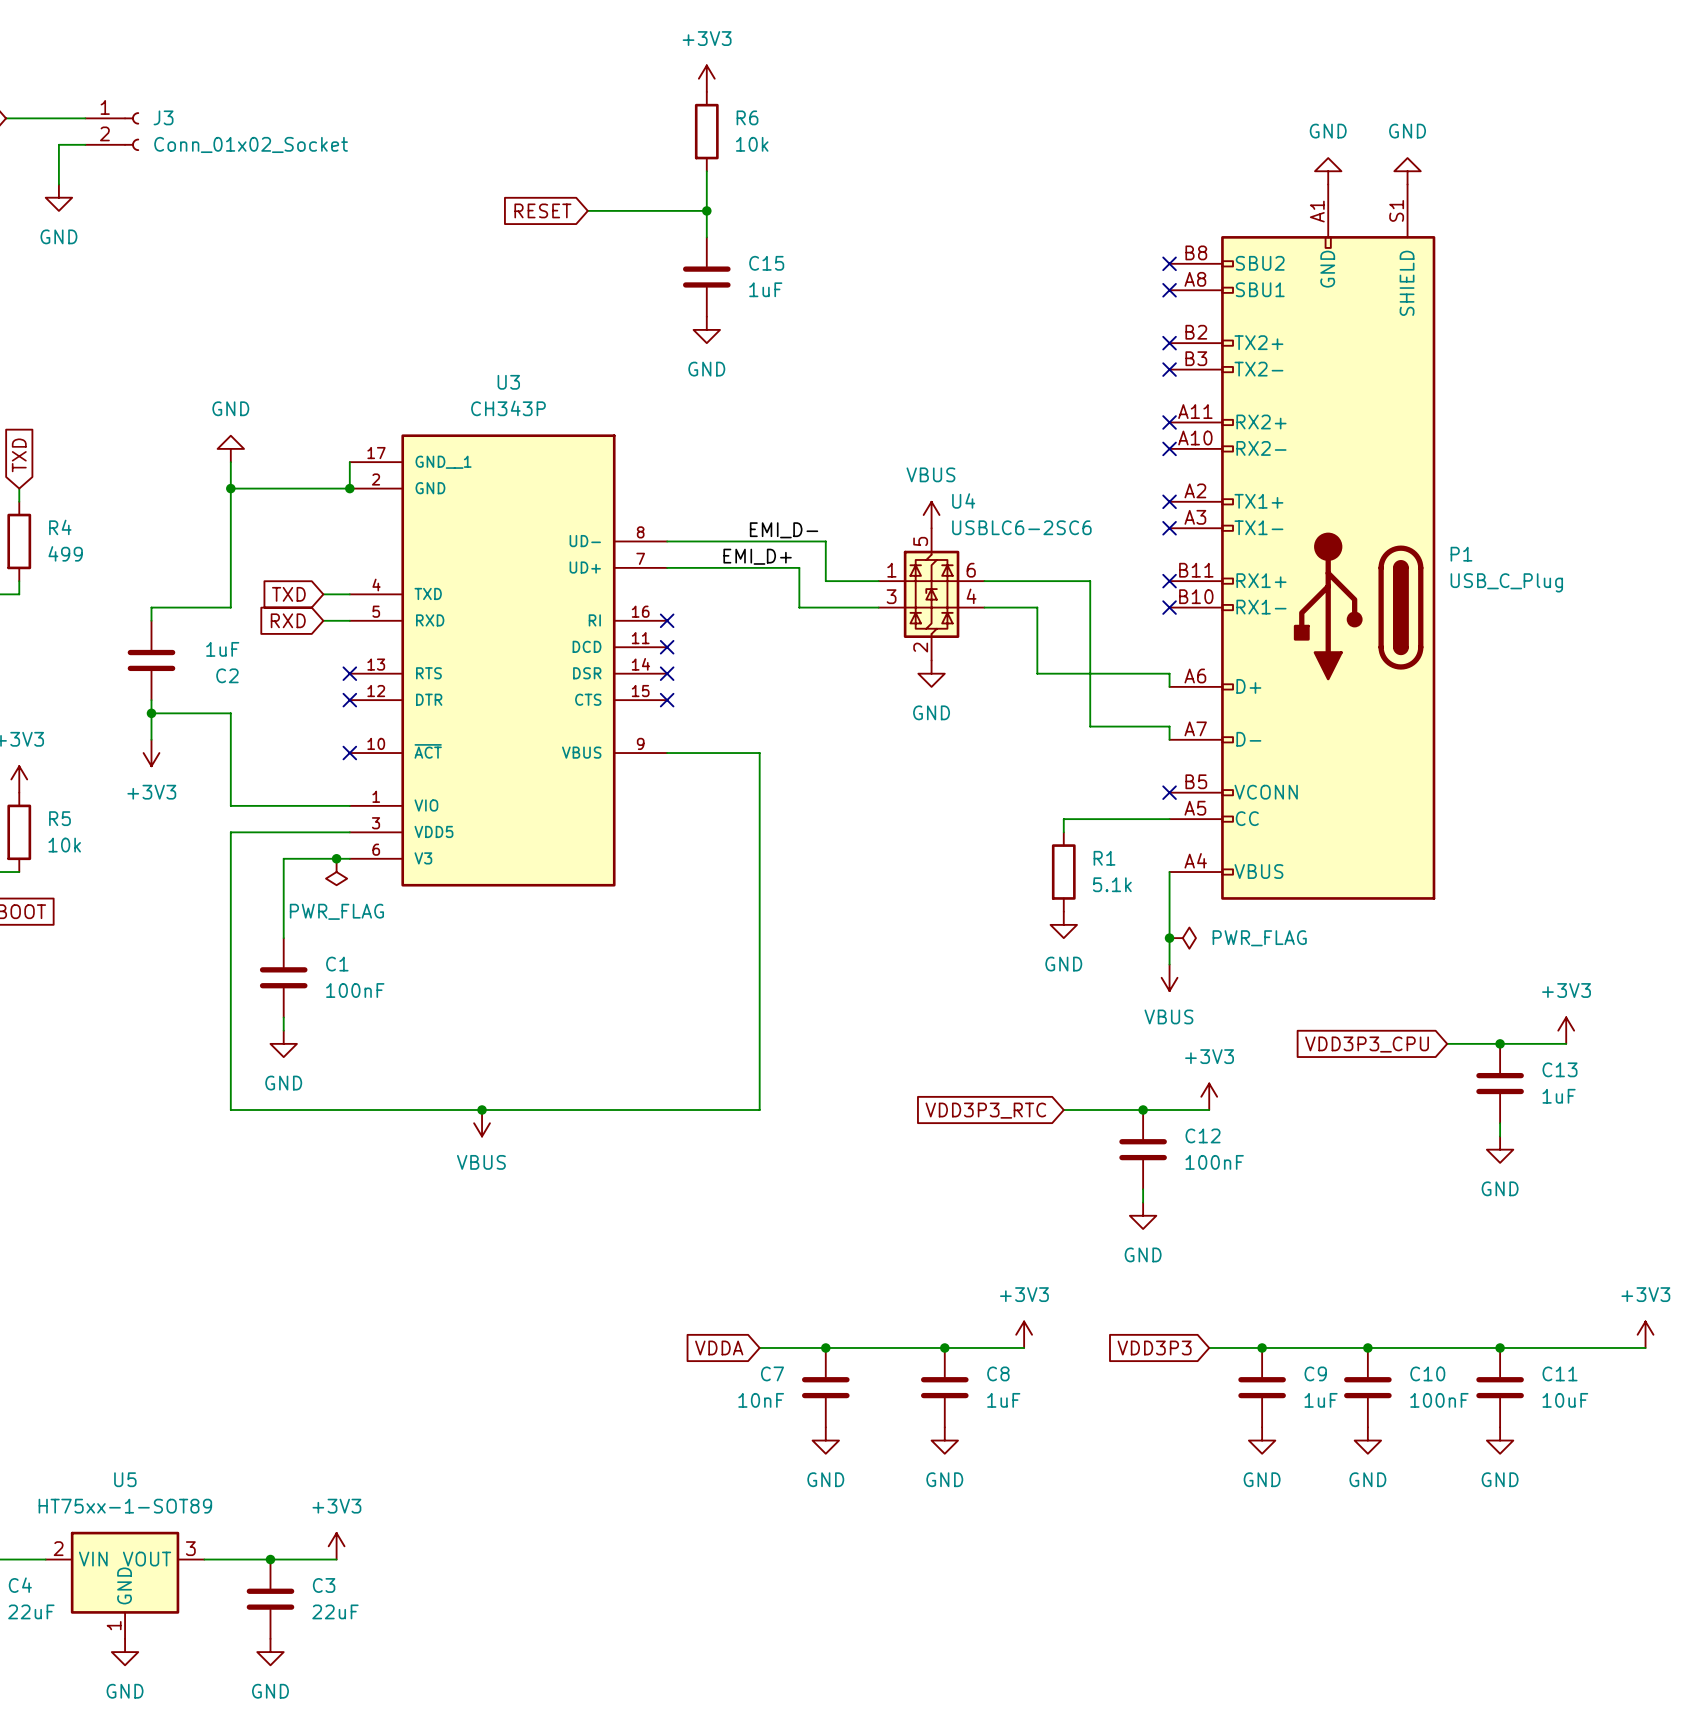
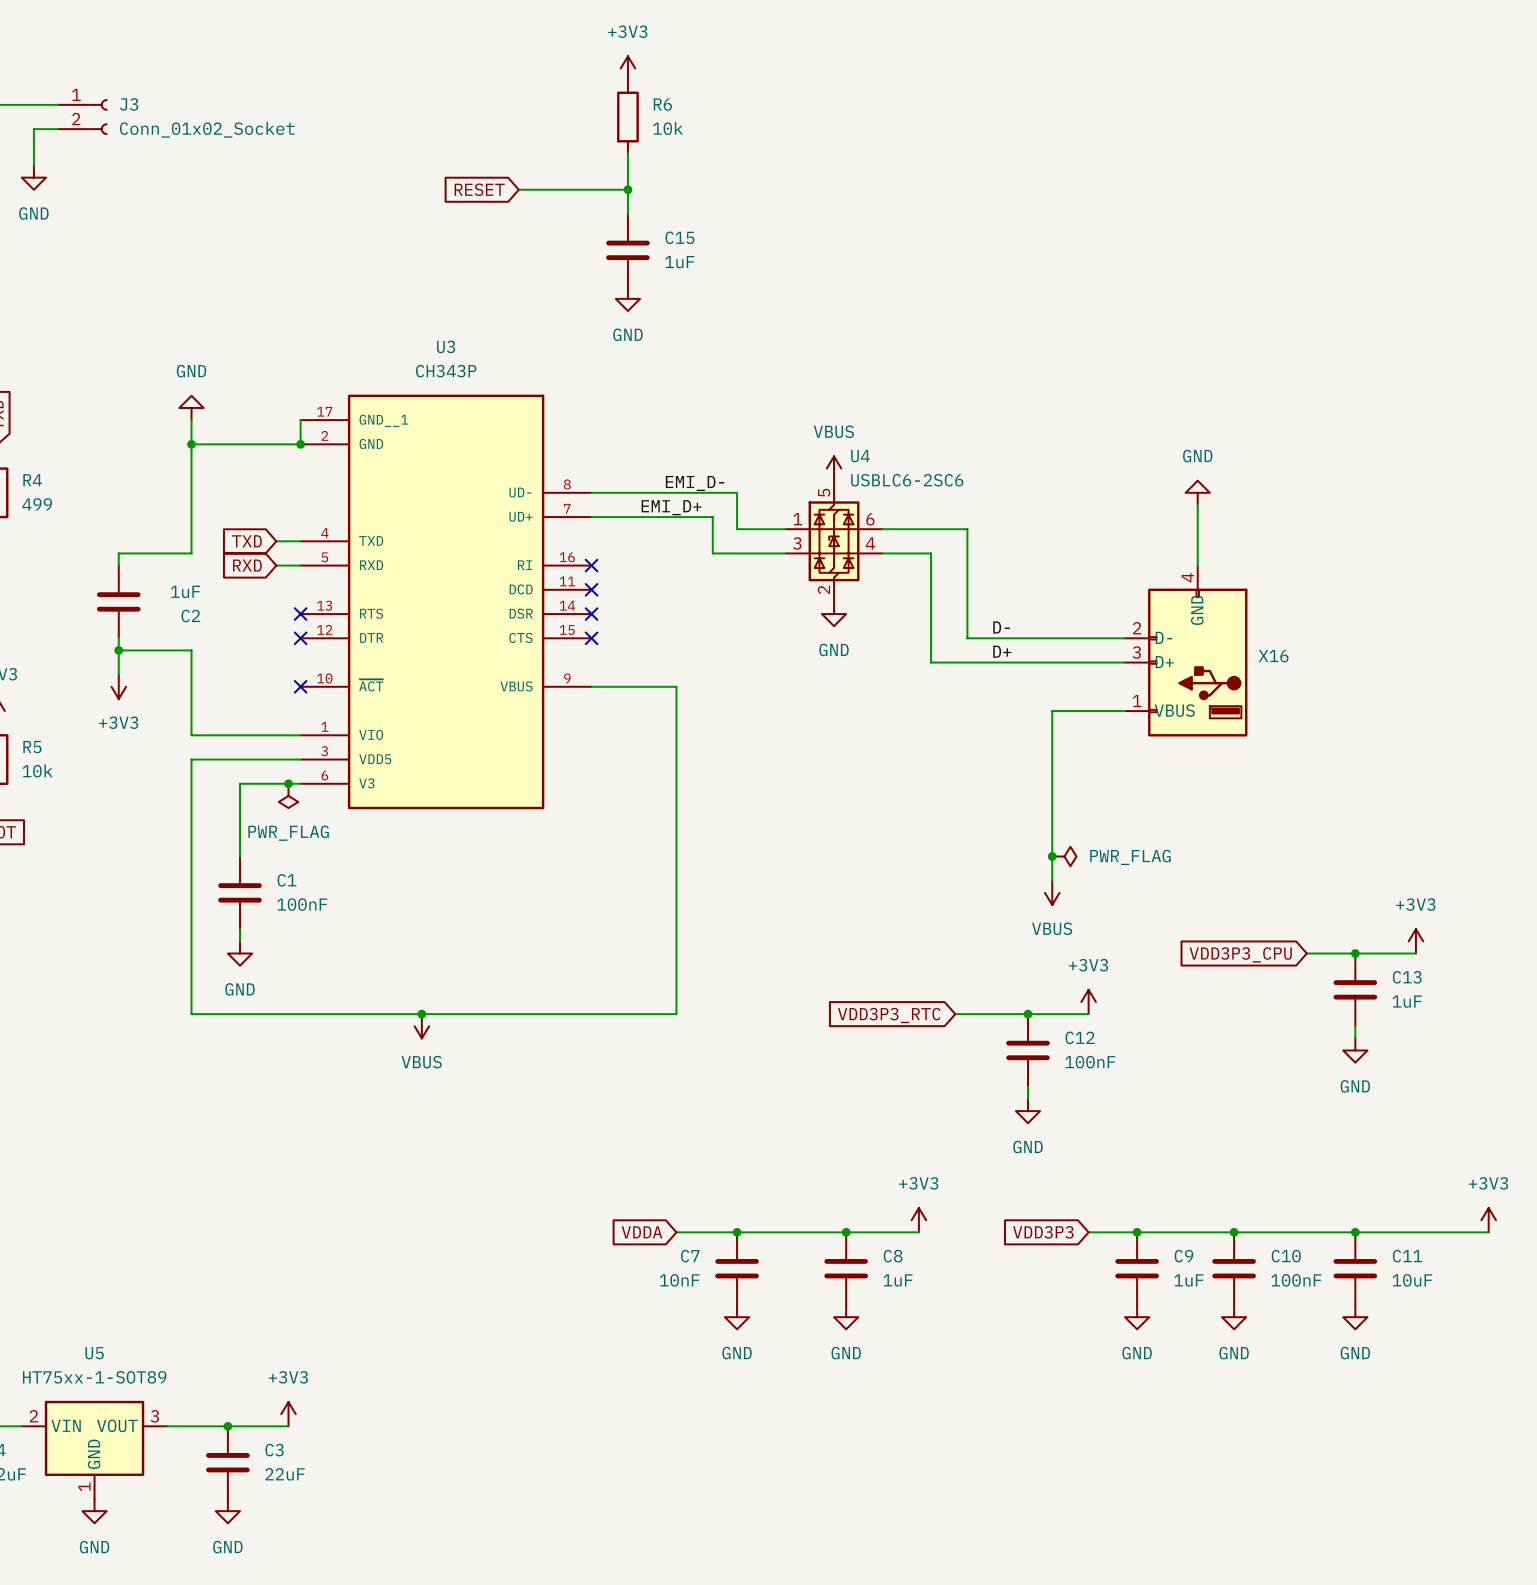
power symbol: GND (1328, 171) -> none
power symbol: GND (1407, 171) -> none
no-connect mark: (1169, 263) -> none
no-connect mark: (1169, 290) -> none
no-connect mark: (1169, 343) -> none
no-connect mark: (1169, 369) -> none
no-connect mark: (1169, 422) -> none
no-connect mark: (1169, 448) -> none
no-connect mark: (1169, 501) -> none
no-connect mark: (1169, 528) -> none
power symbol: none -> GND (1197, 492)
P1: USB_C_Plug (1302, 542) -> none
wire: (1077, 581) (1090, 581) (1090, 726) -> (967, 529) (967, 638) (1124, 638)
no-connect mark: (1169, 581) -> none
no-connect mark: (1169, 607) -> none
wire: (1037, 673) (1169, 673) (1169, 686) -> (931, 614) (931, 662) (979, 662)
label: none -> D- (1001, 627)
label: none -> D+ (1002, 651)
X16: none -> (1186, 651)
wire: (1169, 726) (1169, 739) -> (1052, 662) (1124, 662)
wire: none -> (1124, 711) (1052, 711) (1052, 795)
no-connect mark: (1169, 792) -> none
wire: (1169, 819) (1063, 819) (1063, 832) -> none
R1: 5.1k (1063, 872) -> none
power symbol: GND (1063, 924) -> none

